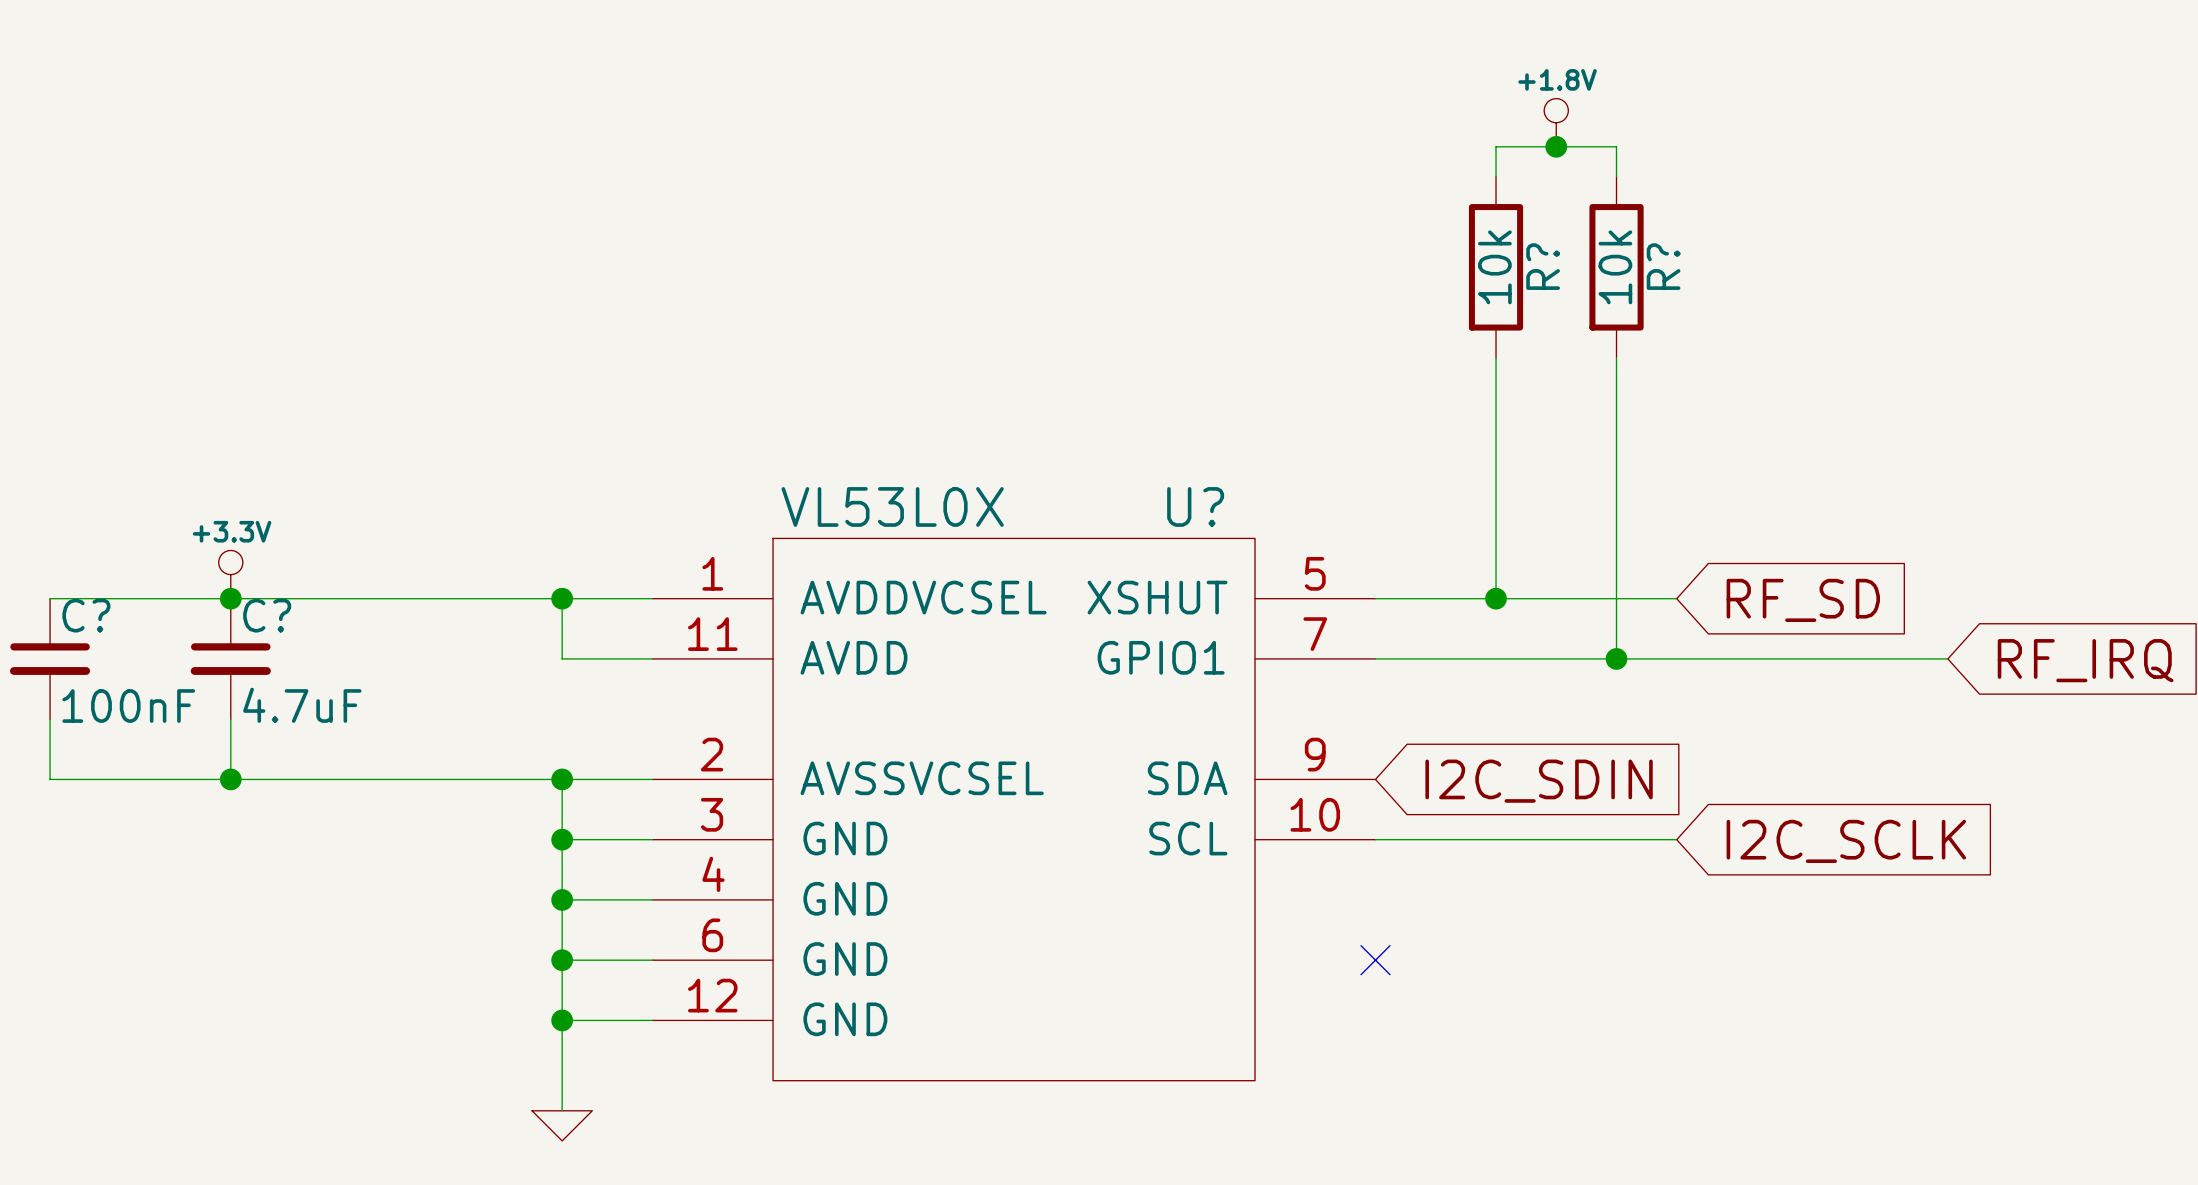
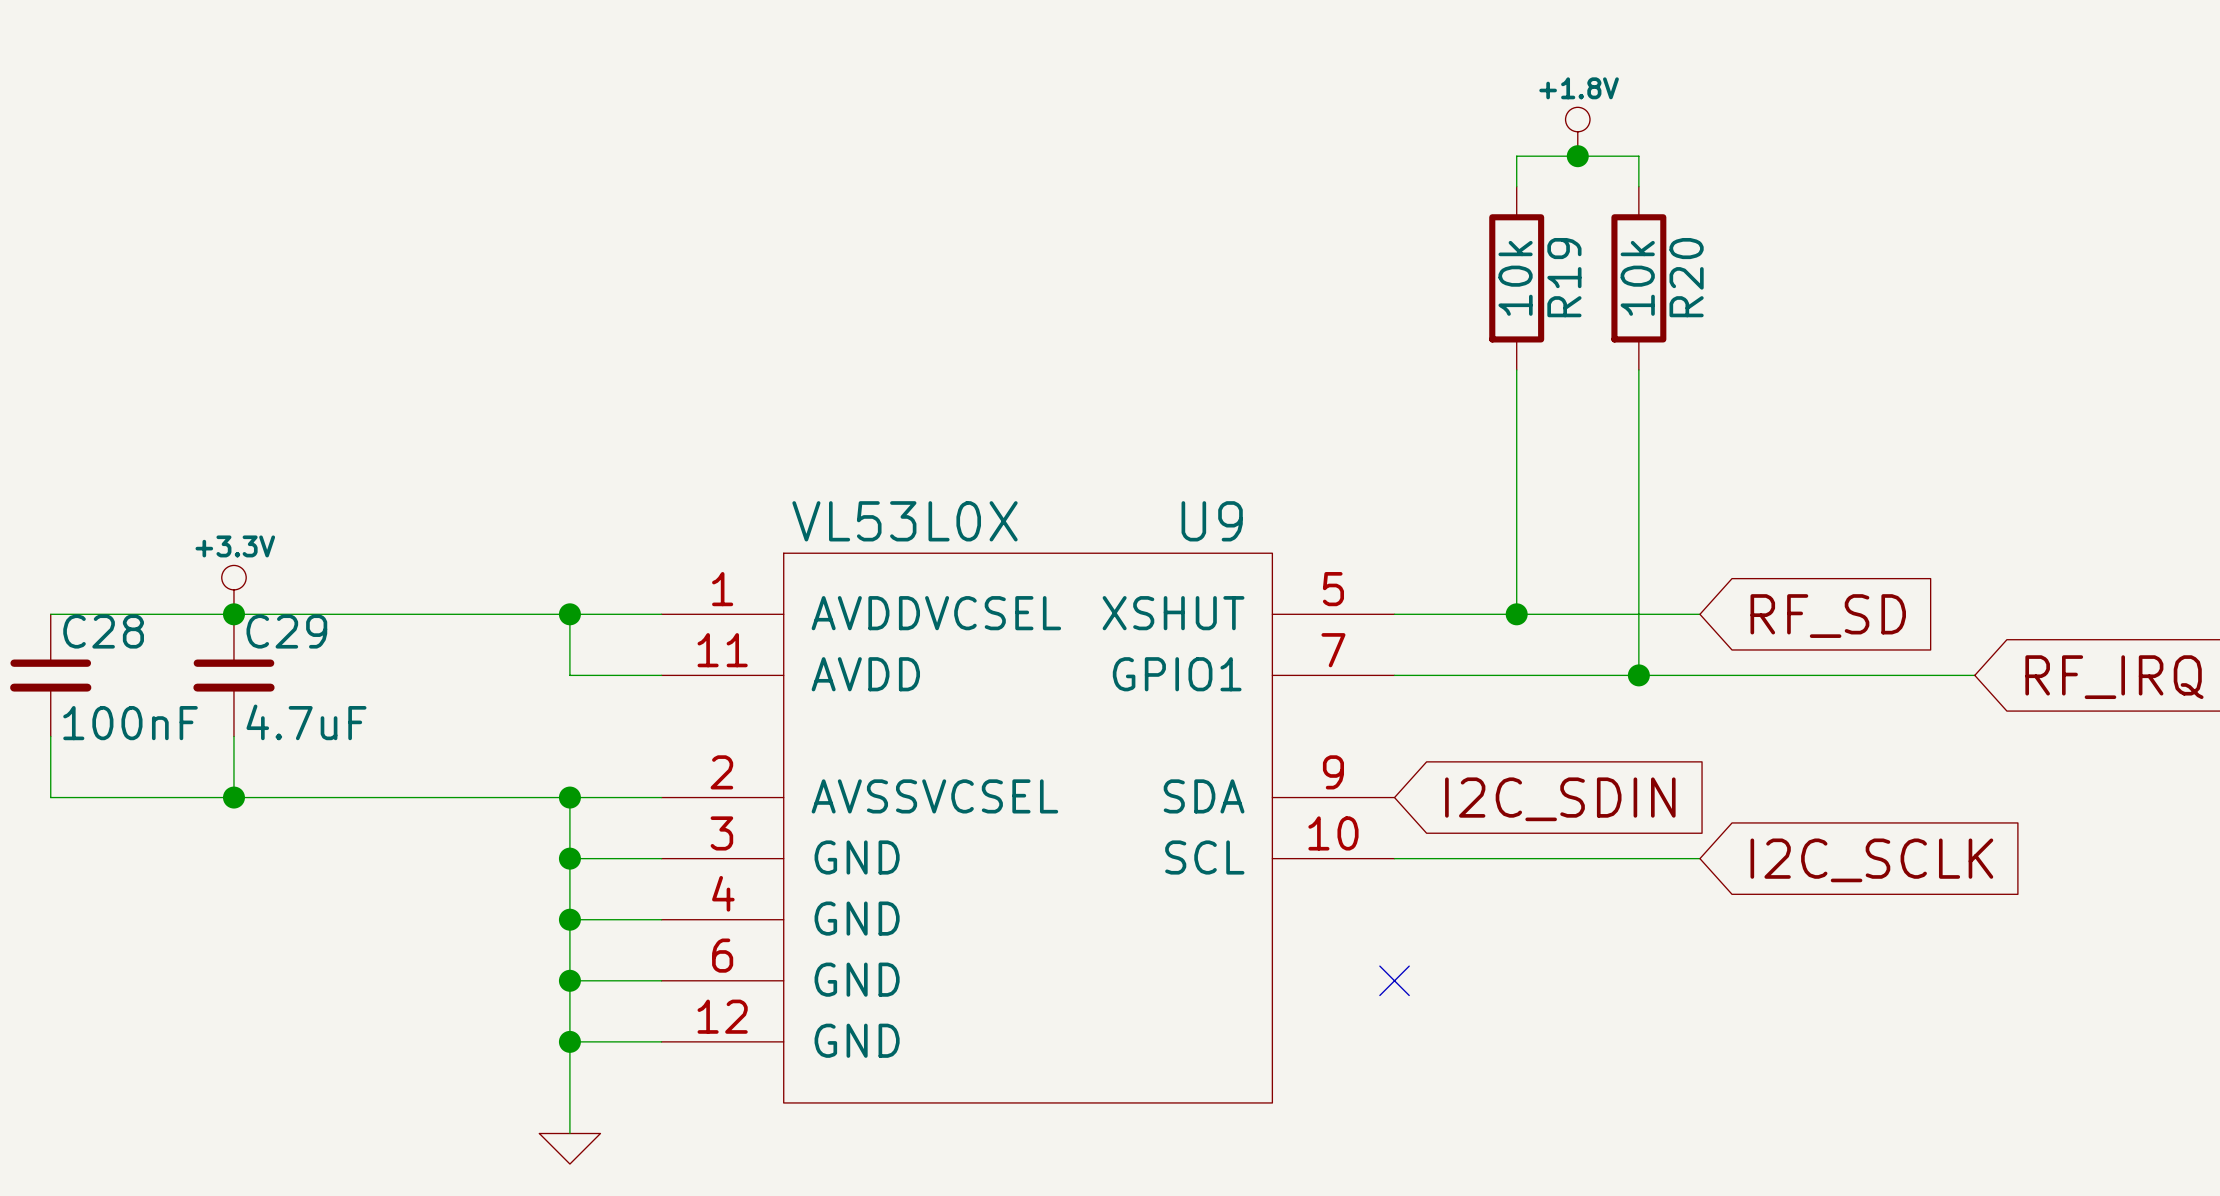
R? name: R? (1543, 266) -> R19 (1564, 277)
R? name: R? (1663, 266) -> R20 (1686, 277)
U? name: U? (1195, 506) -> U9 (1212, 521)
C? name: C? (86, 615) -> C28 (103, 631)
C? name: C? (267, 615) -> C29 (286, 631)

